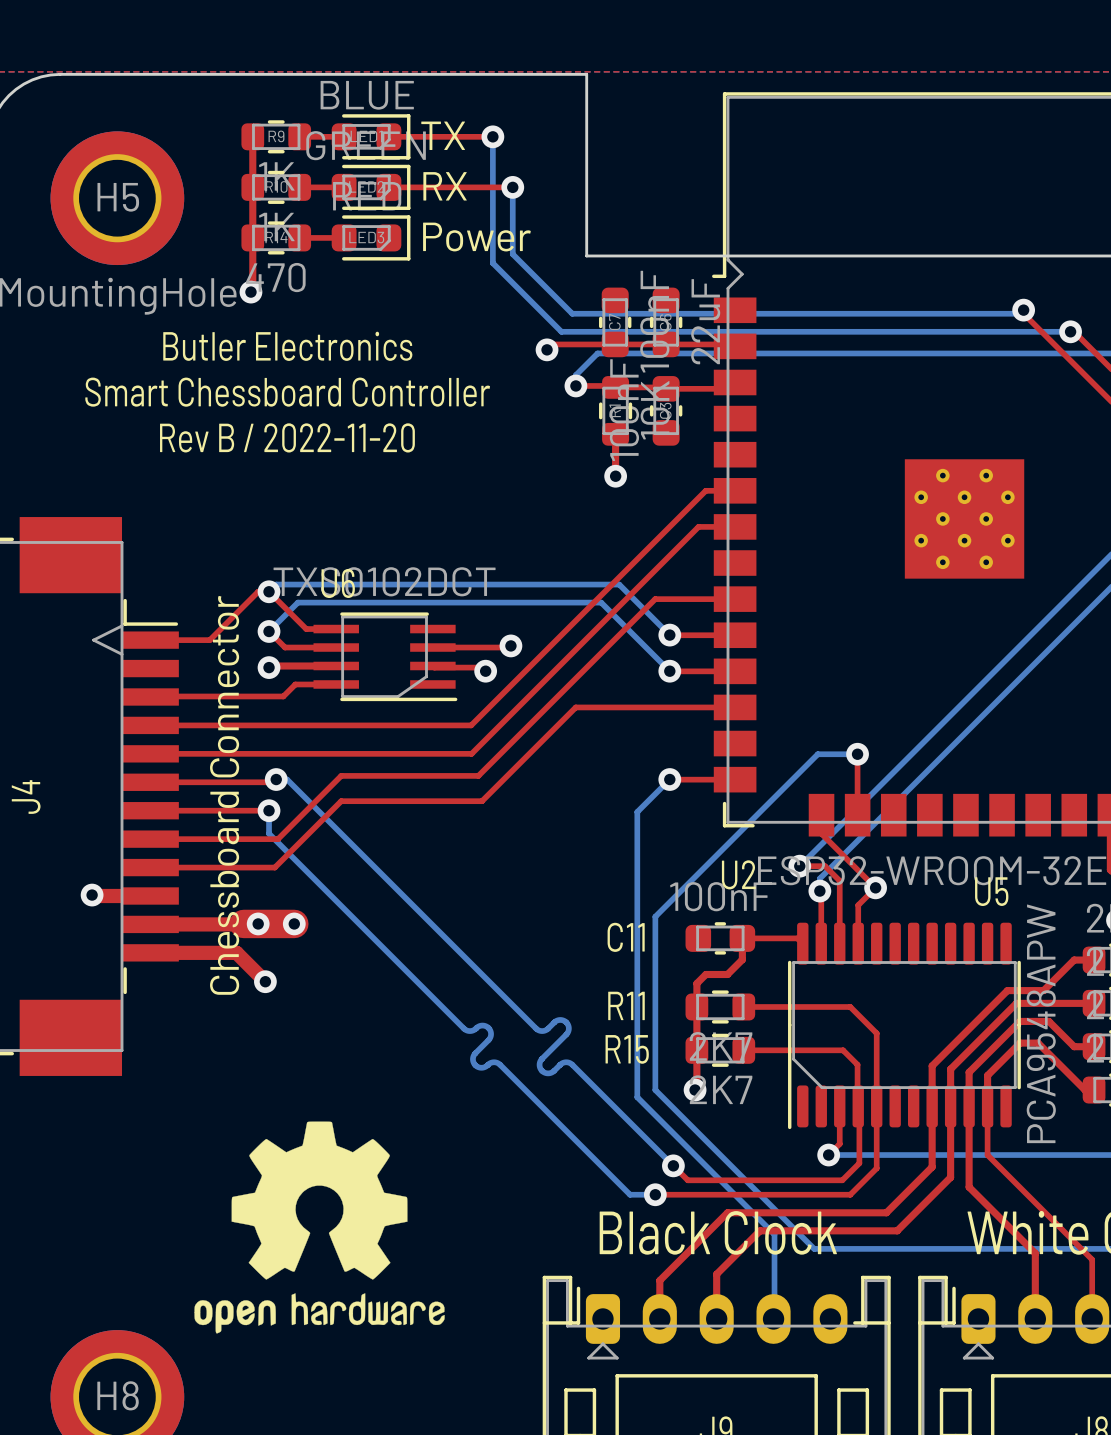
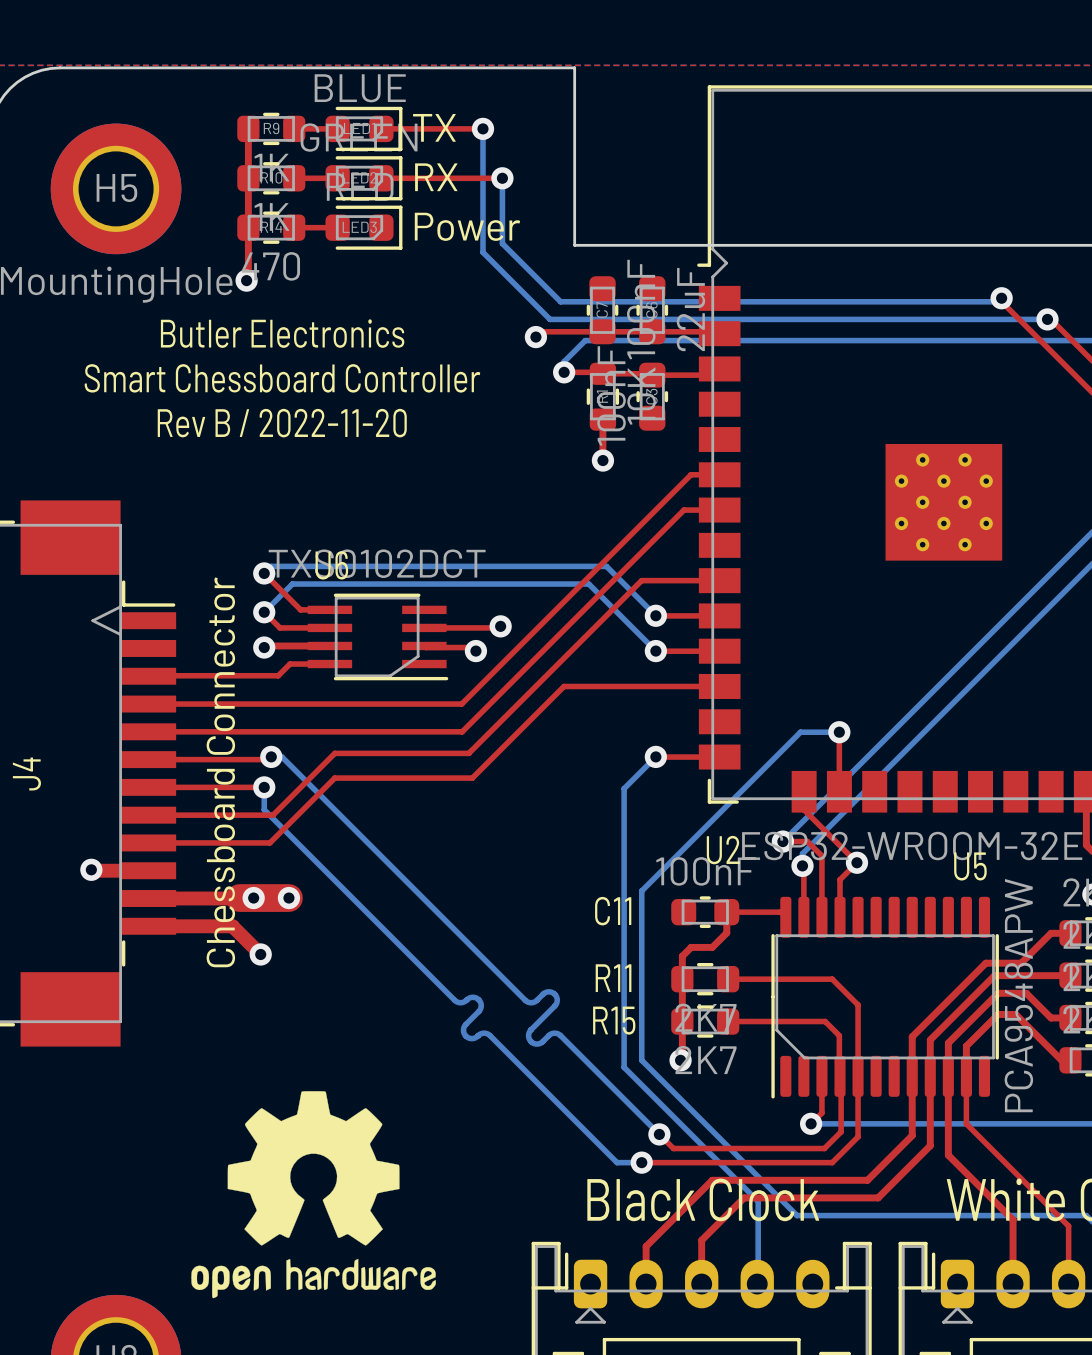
top track: (269, 591) (258, 591) (209, 640) (150, 640) -> none

